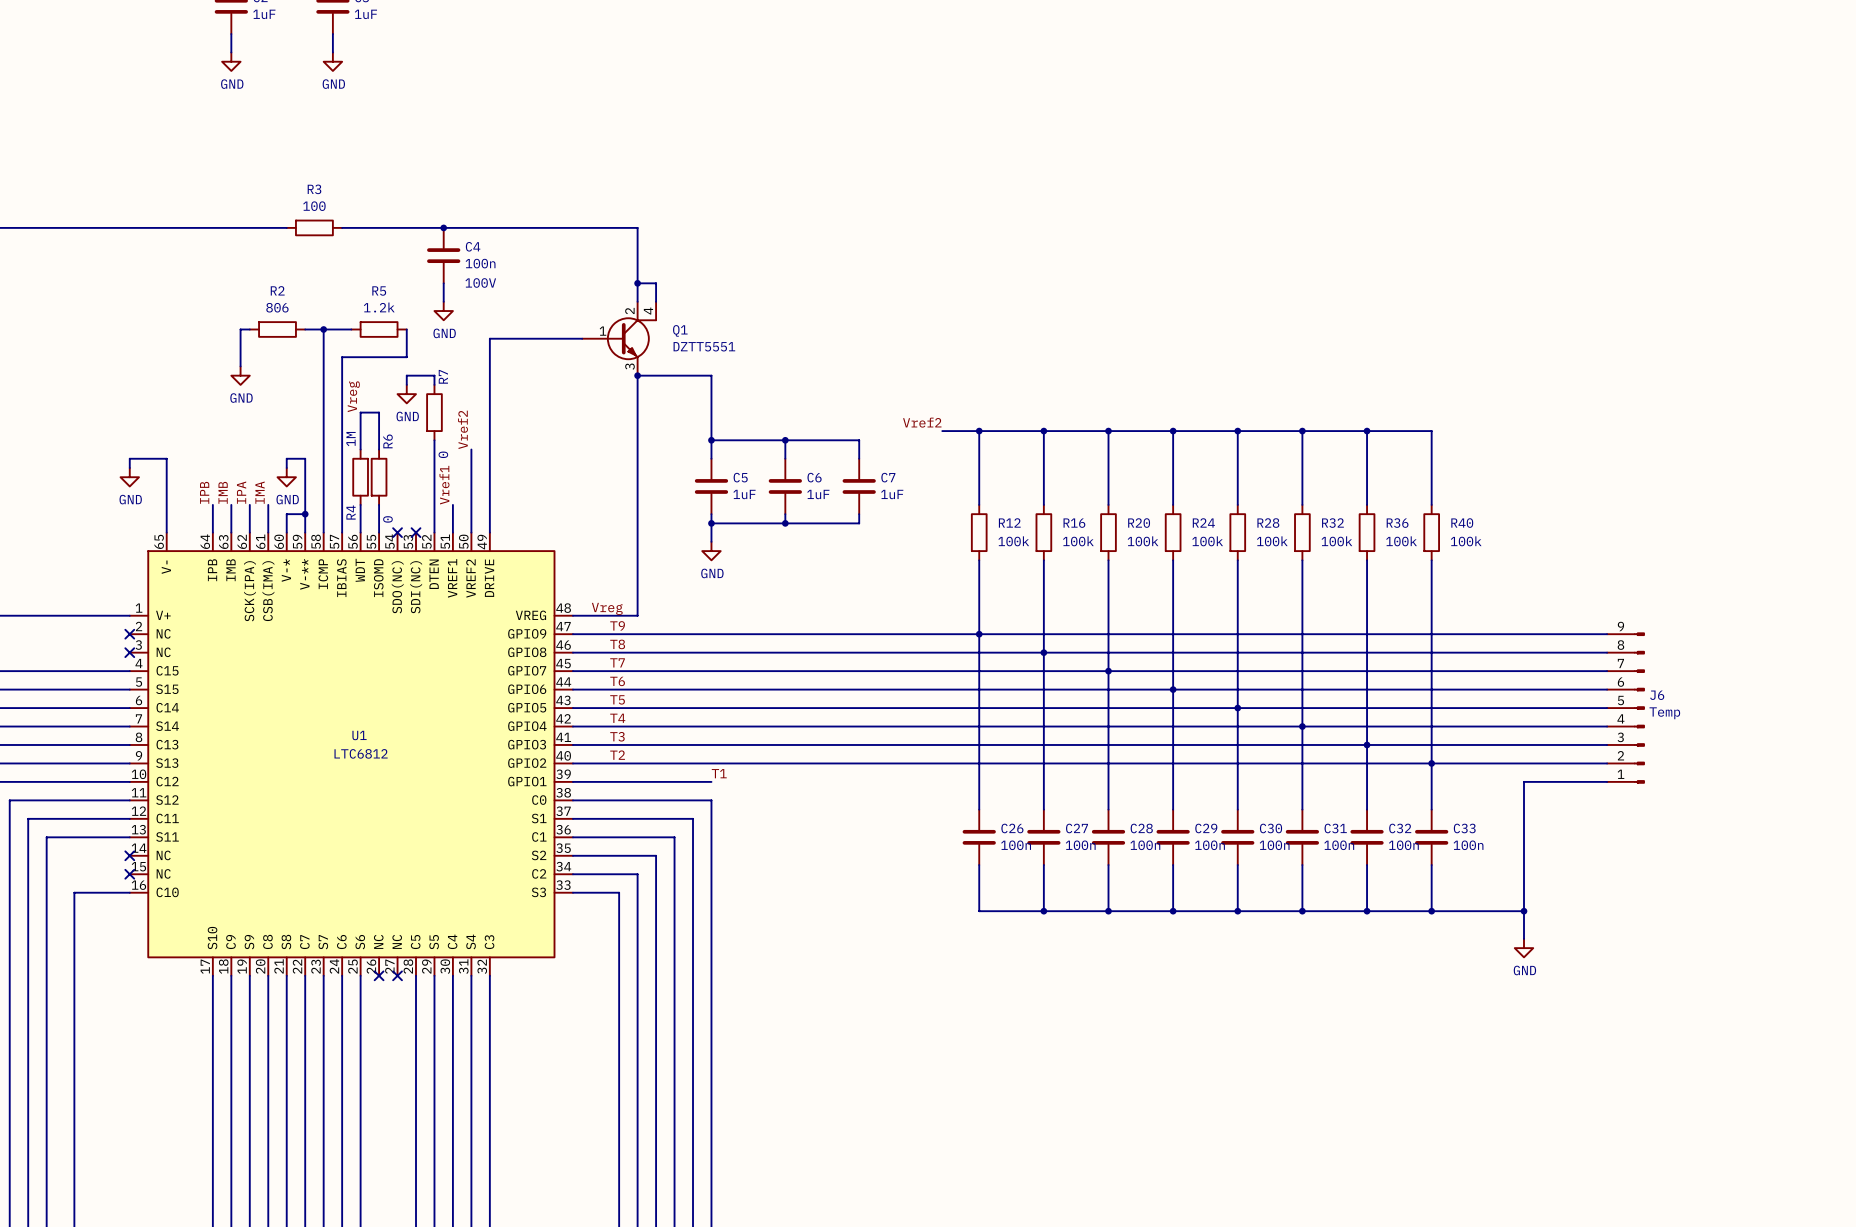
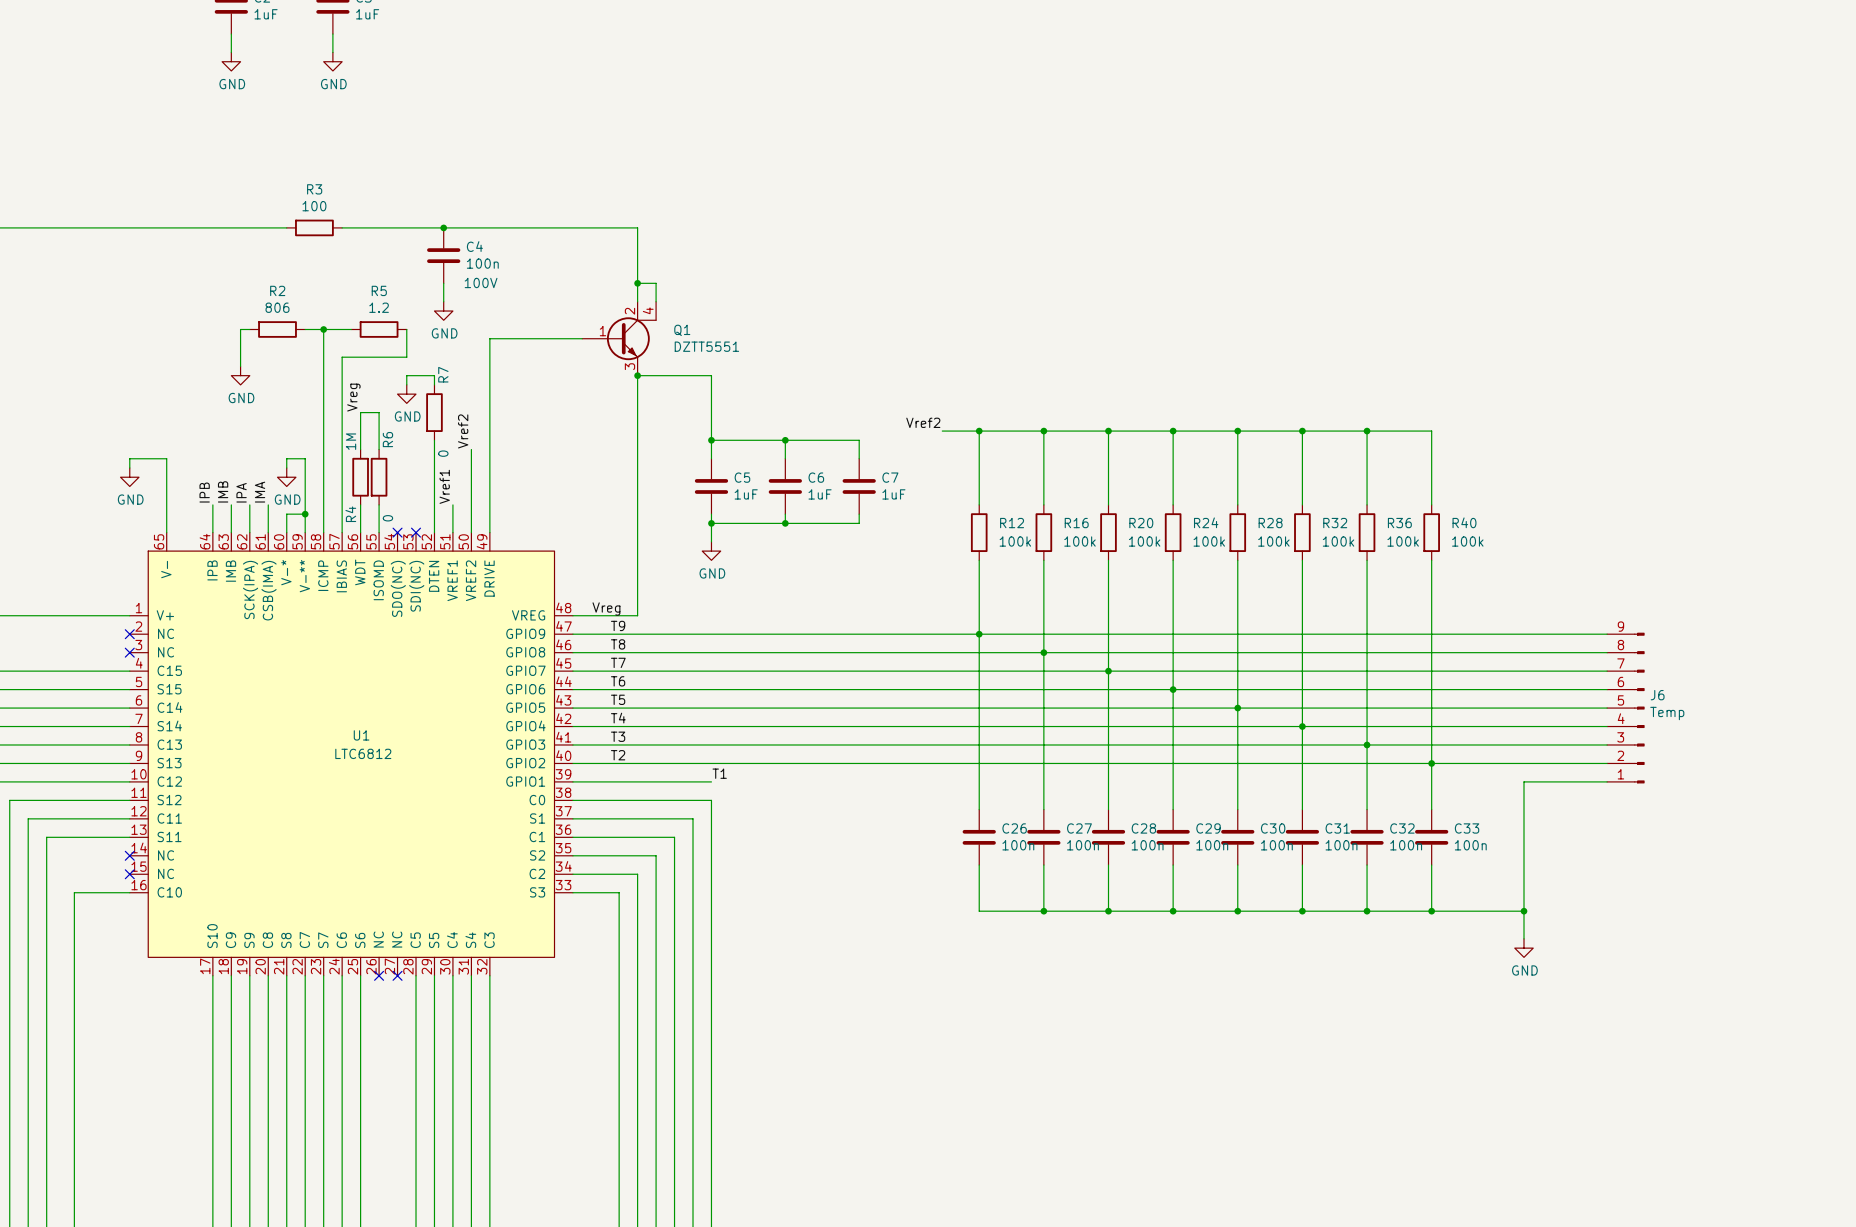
R5 value: 1.2k (379, 307) -> 1.2 (379, 307)

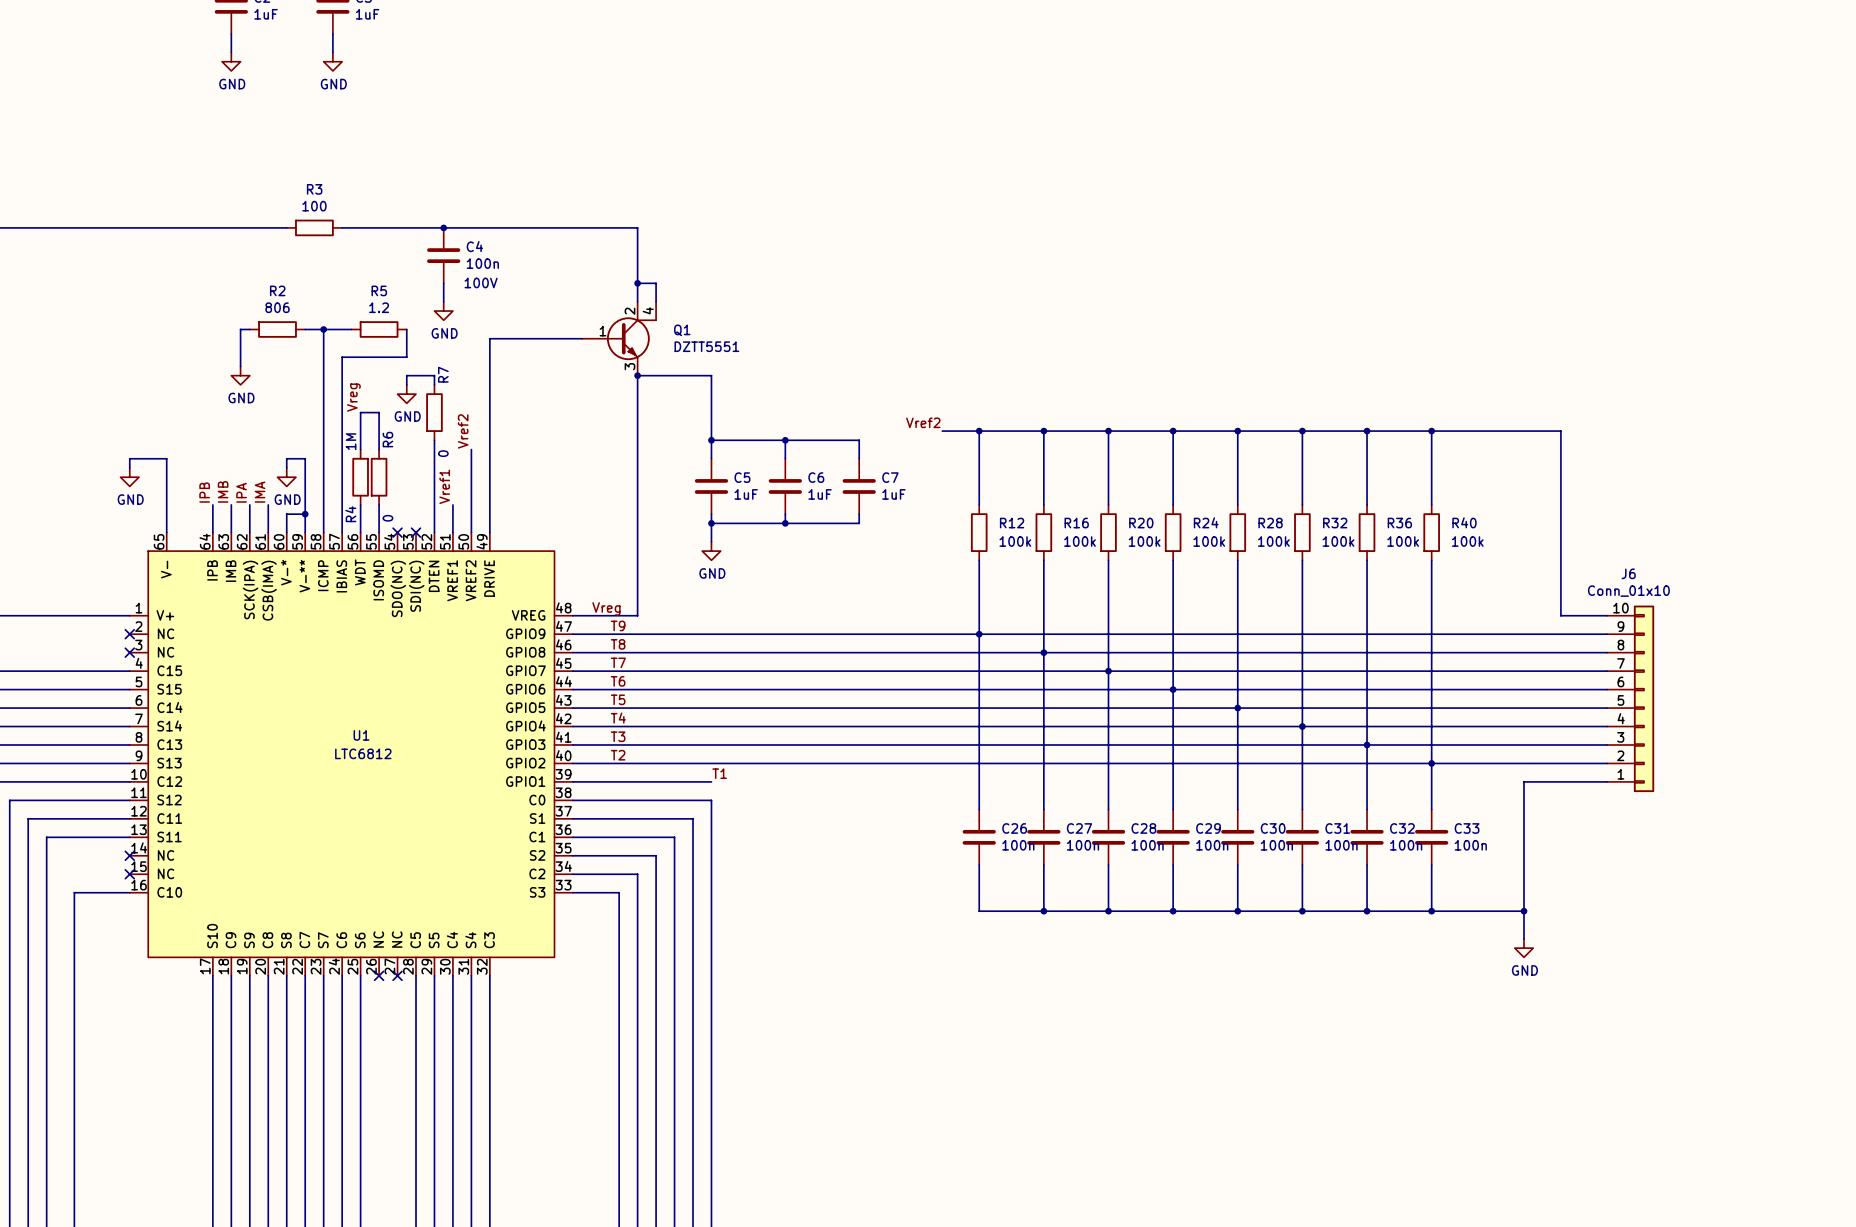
wire: none -> (1431, 431) (1560, 431) (1560, 615) (1607, 615)
junction: none -> (1431, 431)
J6 symbol: [1607, 632, 1645, 784] -> [1607, 605, 1655, 793]
J6 name position: J6 (1657, 695) -> J6 (1628, 573)
J6 value: Temp (1667, 713) -> Conn_01x10 (1628, 591)

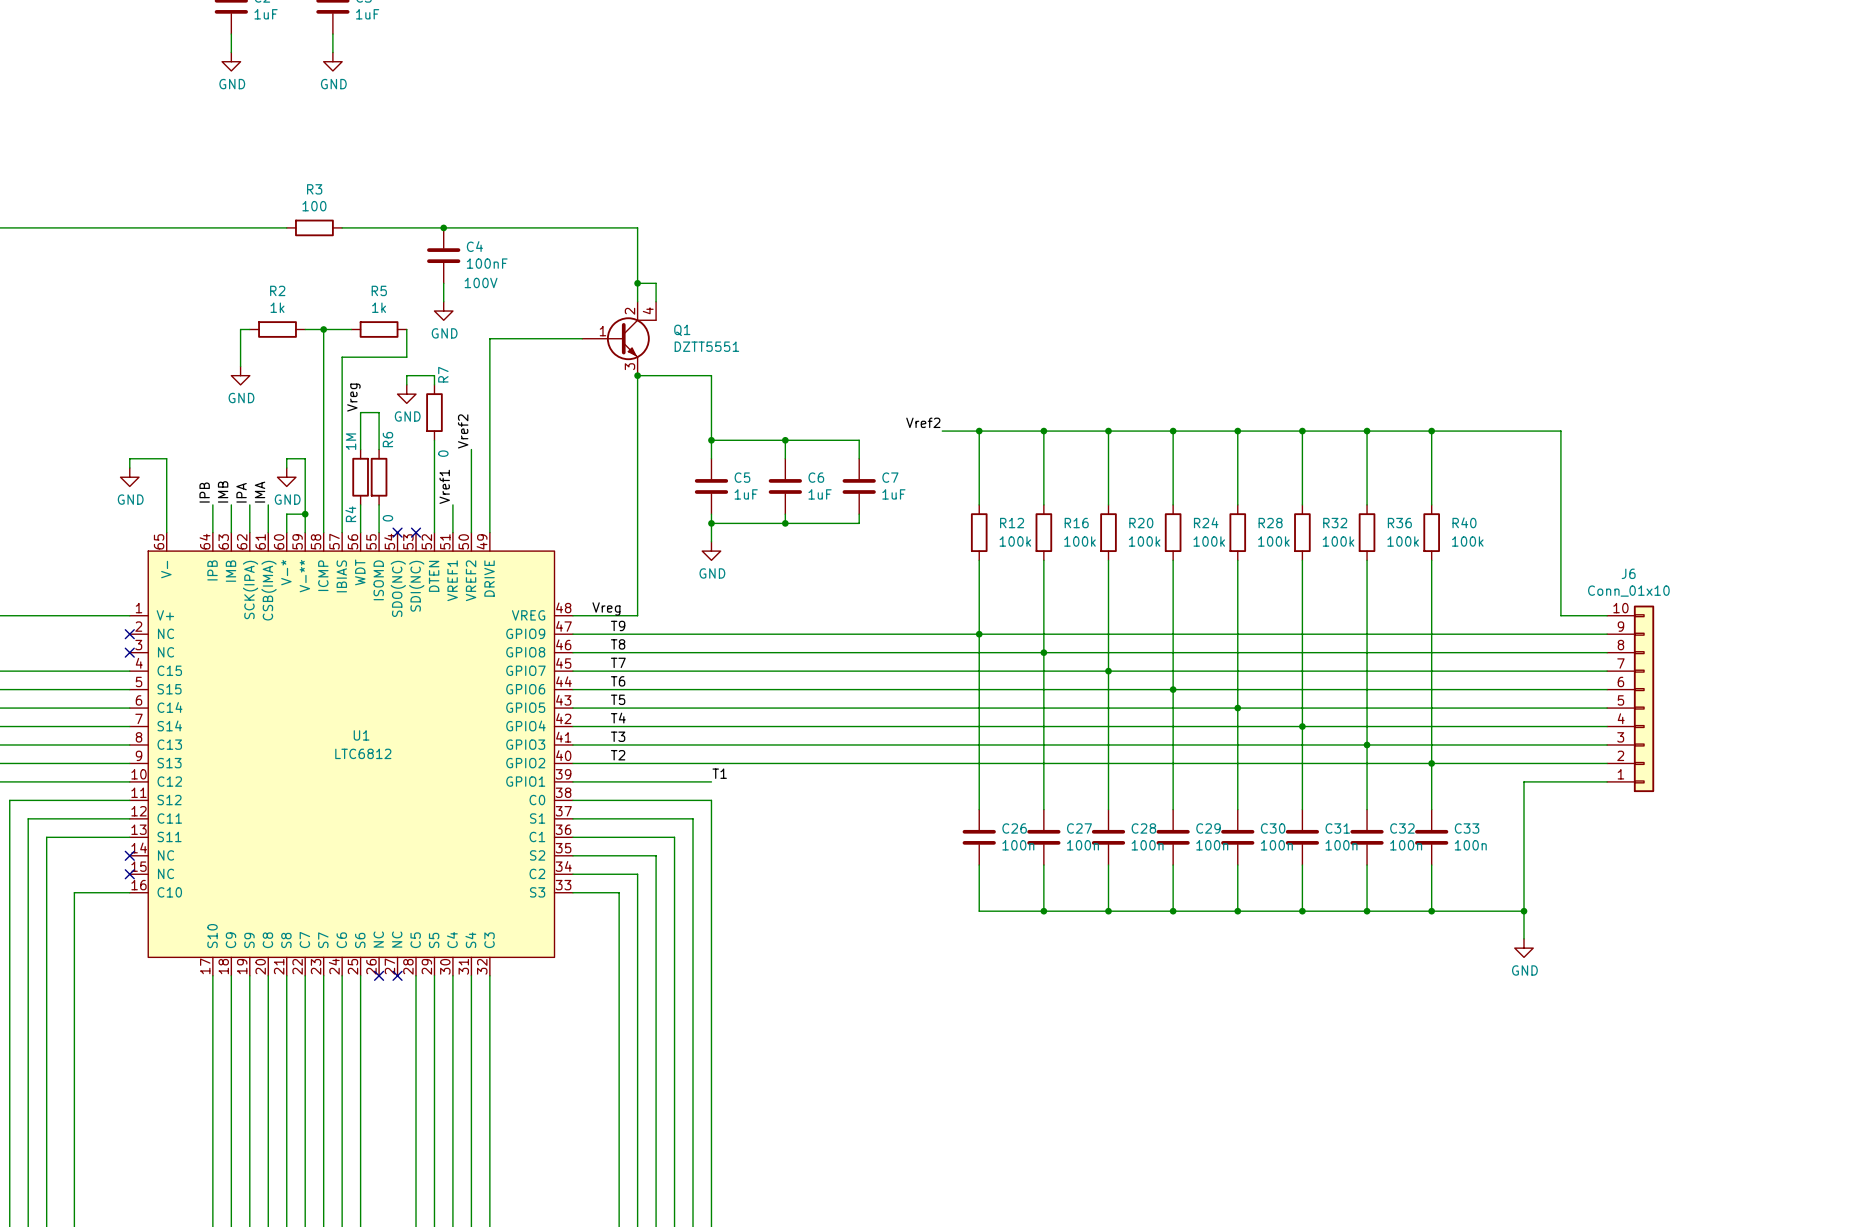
C4 value: 100n (482, 263) -> 100nF (487, 263)
R2 value: 806 (277, 307) -> 1k (277, 307)
R5 value: 1.2 (379, 307) -> 1k (379, 307)

